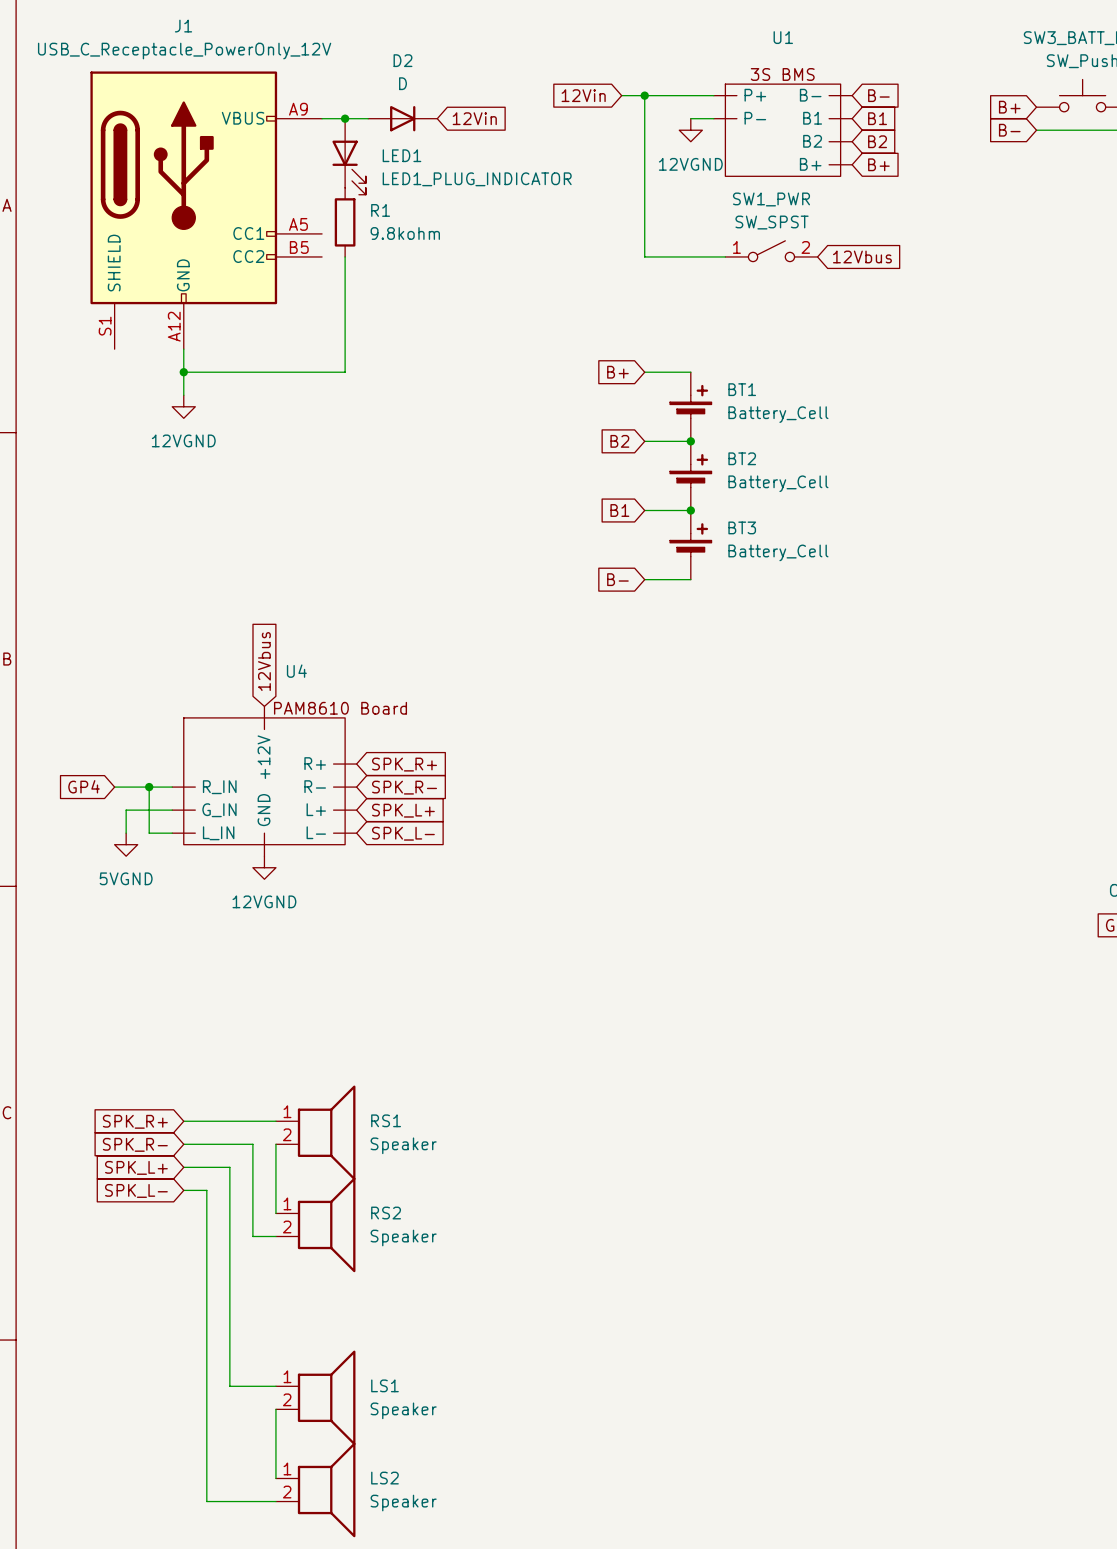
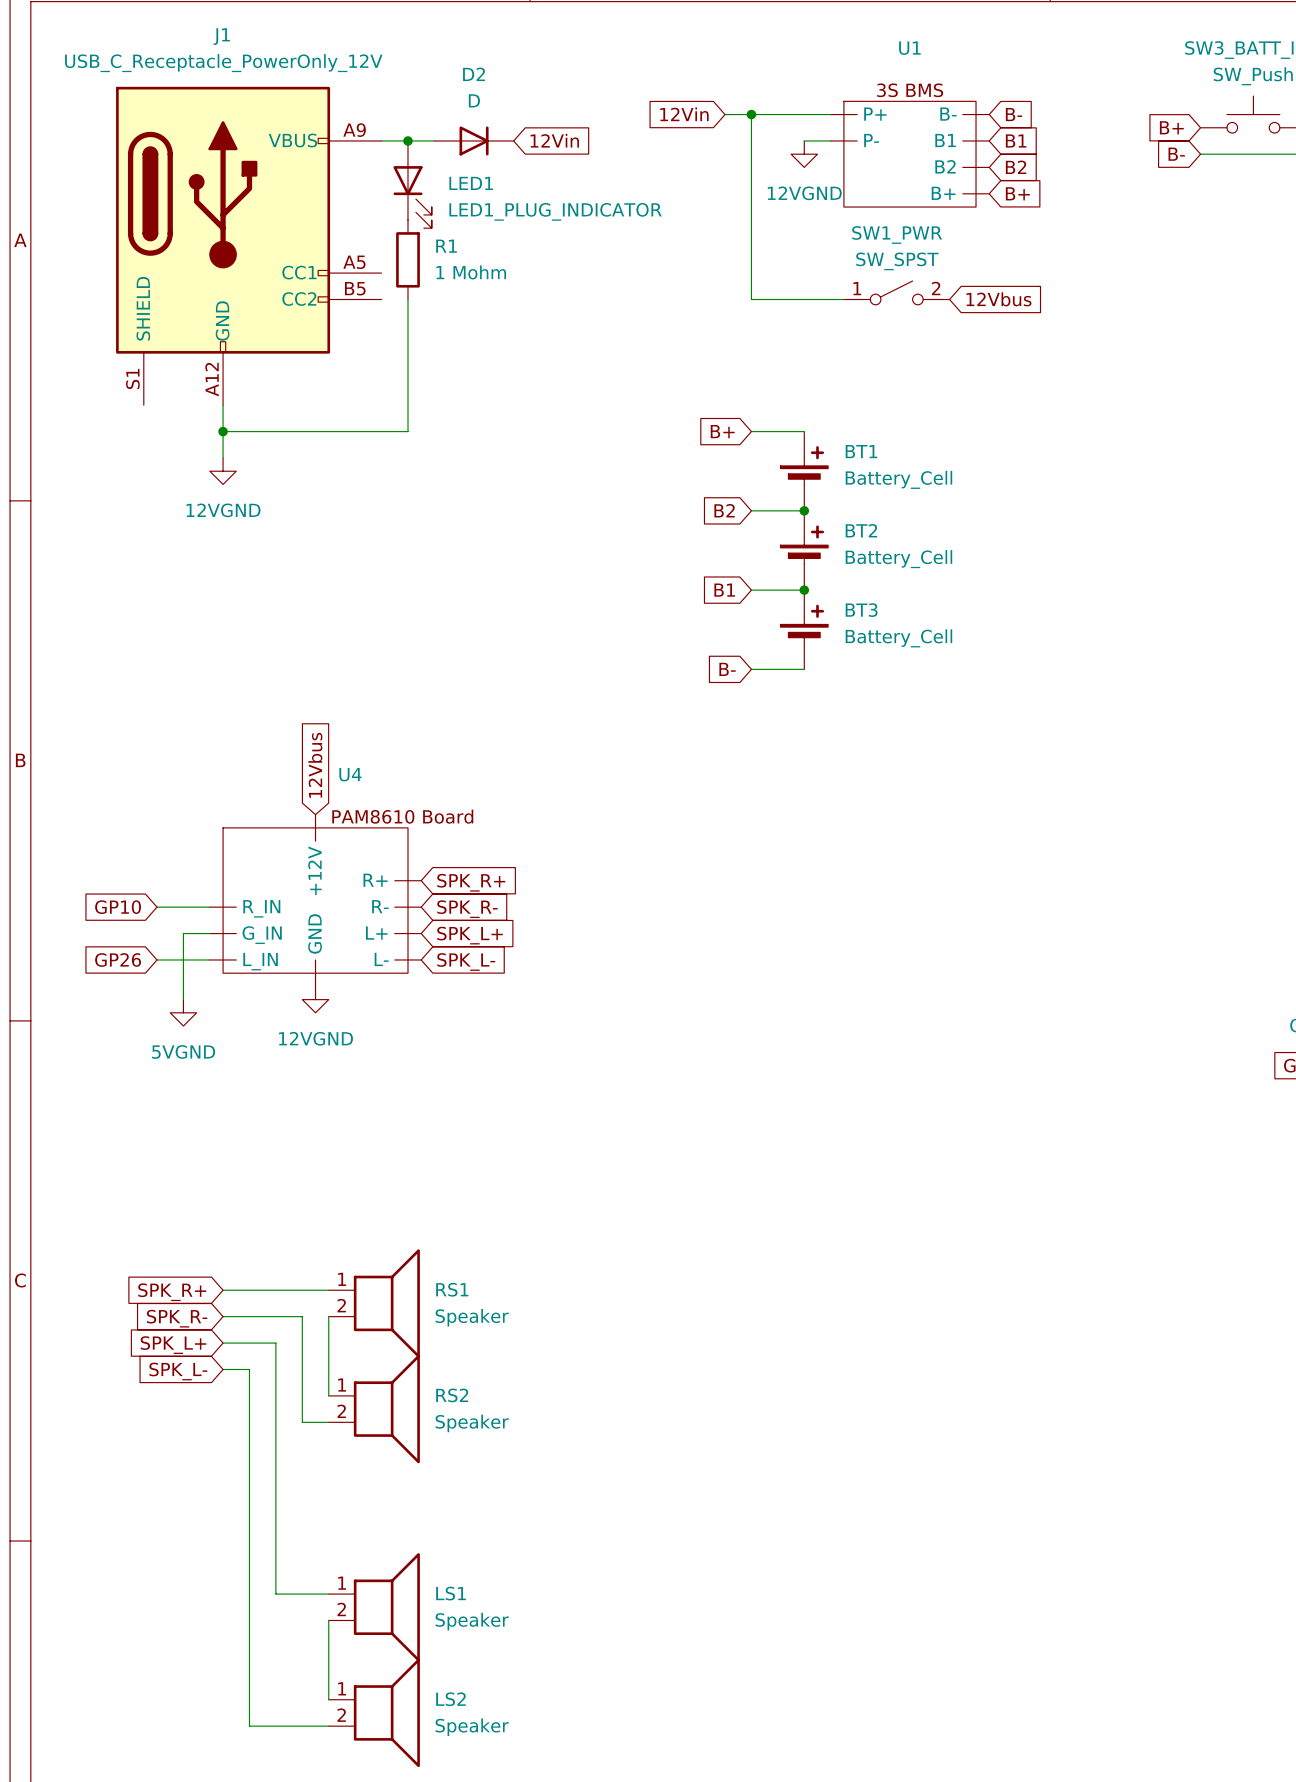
R1 value: 9.8kohm (405, 233) -> 1 Mohm (471, 272)
global label: GP4 (84, 786) -> none
global label: none -> GP10 (118, 907)
wire: (114, 787) (126, 787) -> none
wire: (149, 787) (149, 810) (126, 810) (126, 833) -> (183, 999) (183, 959) (157, 959)
junction: (149, 787) -> none
global label: none -> GP26 (118, 960)
power symbol position: 5VGND (126, 844) -> 5VGND (183, 1012)

